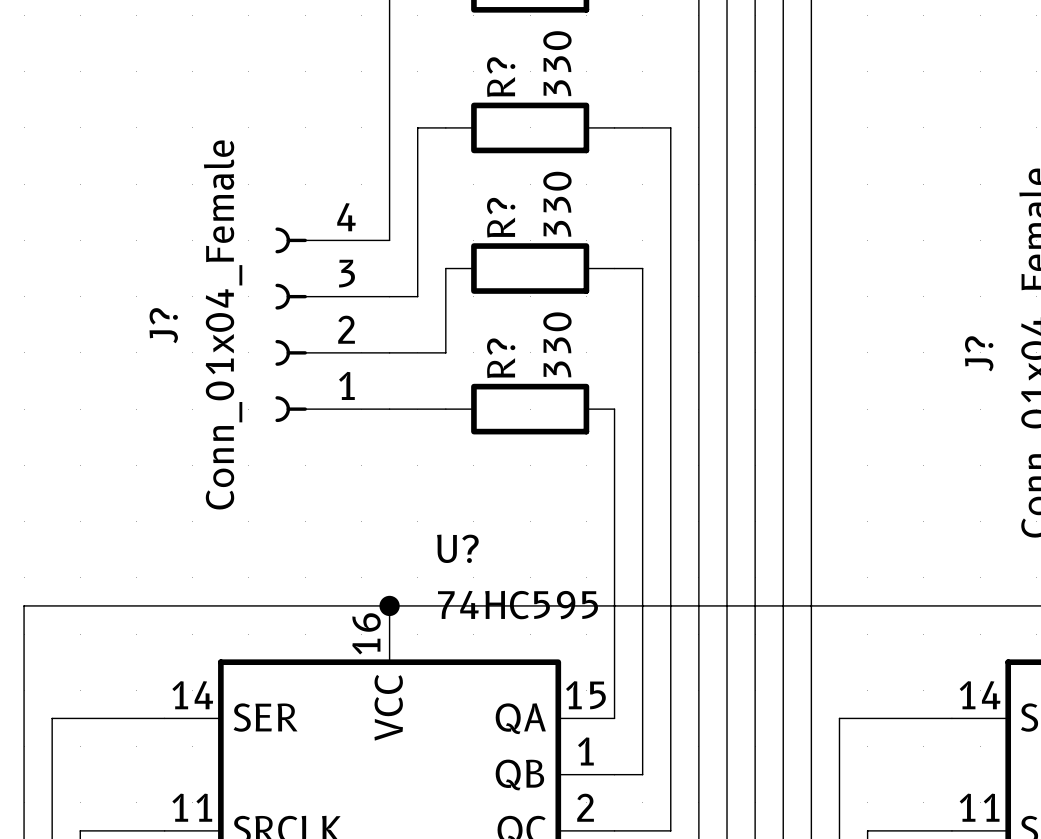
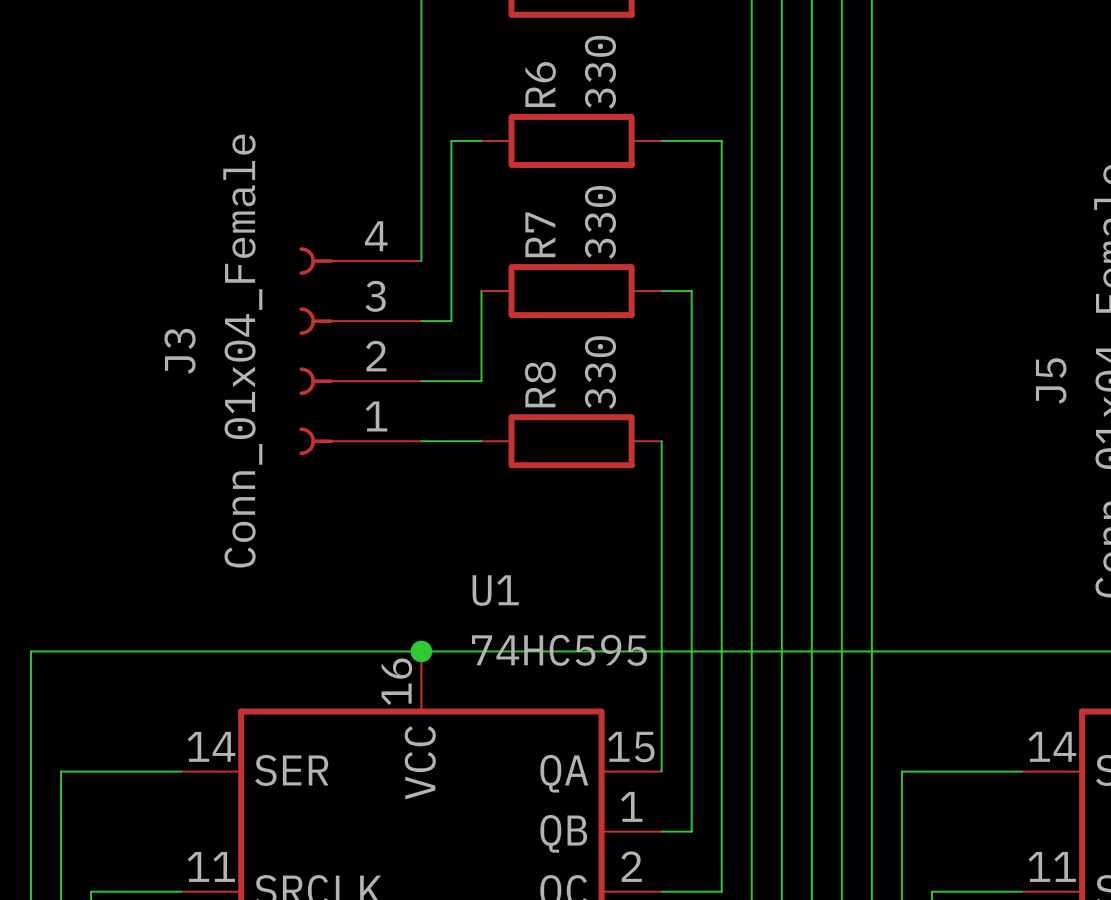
R? name: R? (501, 77) -> R6 (540, 84)
R? name: R? (501, 217) -> R7 (540, 234)
J? name: J? (163, 325) -> J3 (180, 351)
J? name: J? (979, 353) -> J5 (1051, 381)
R? name: R? (501, 358) -> R8 (540, 384)
U? name: U? (457, 548) -> U1 (495, 590)

